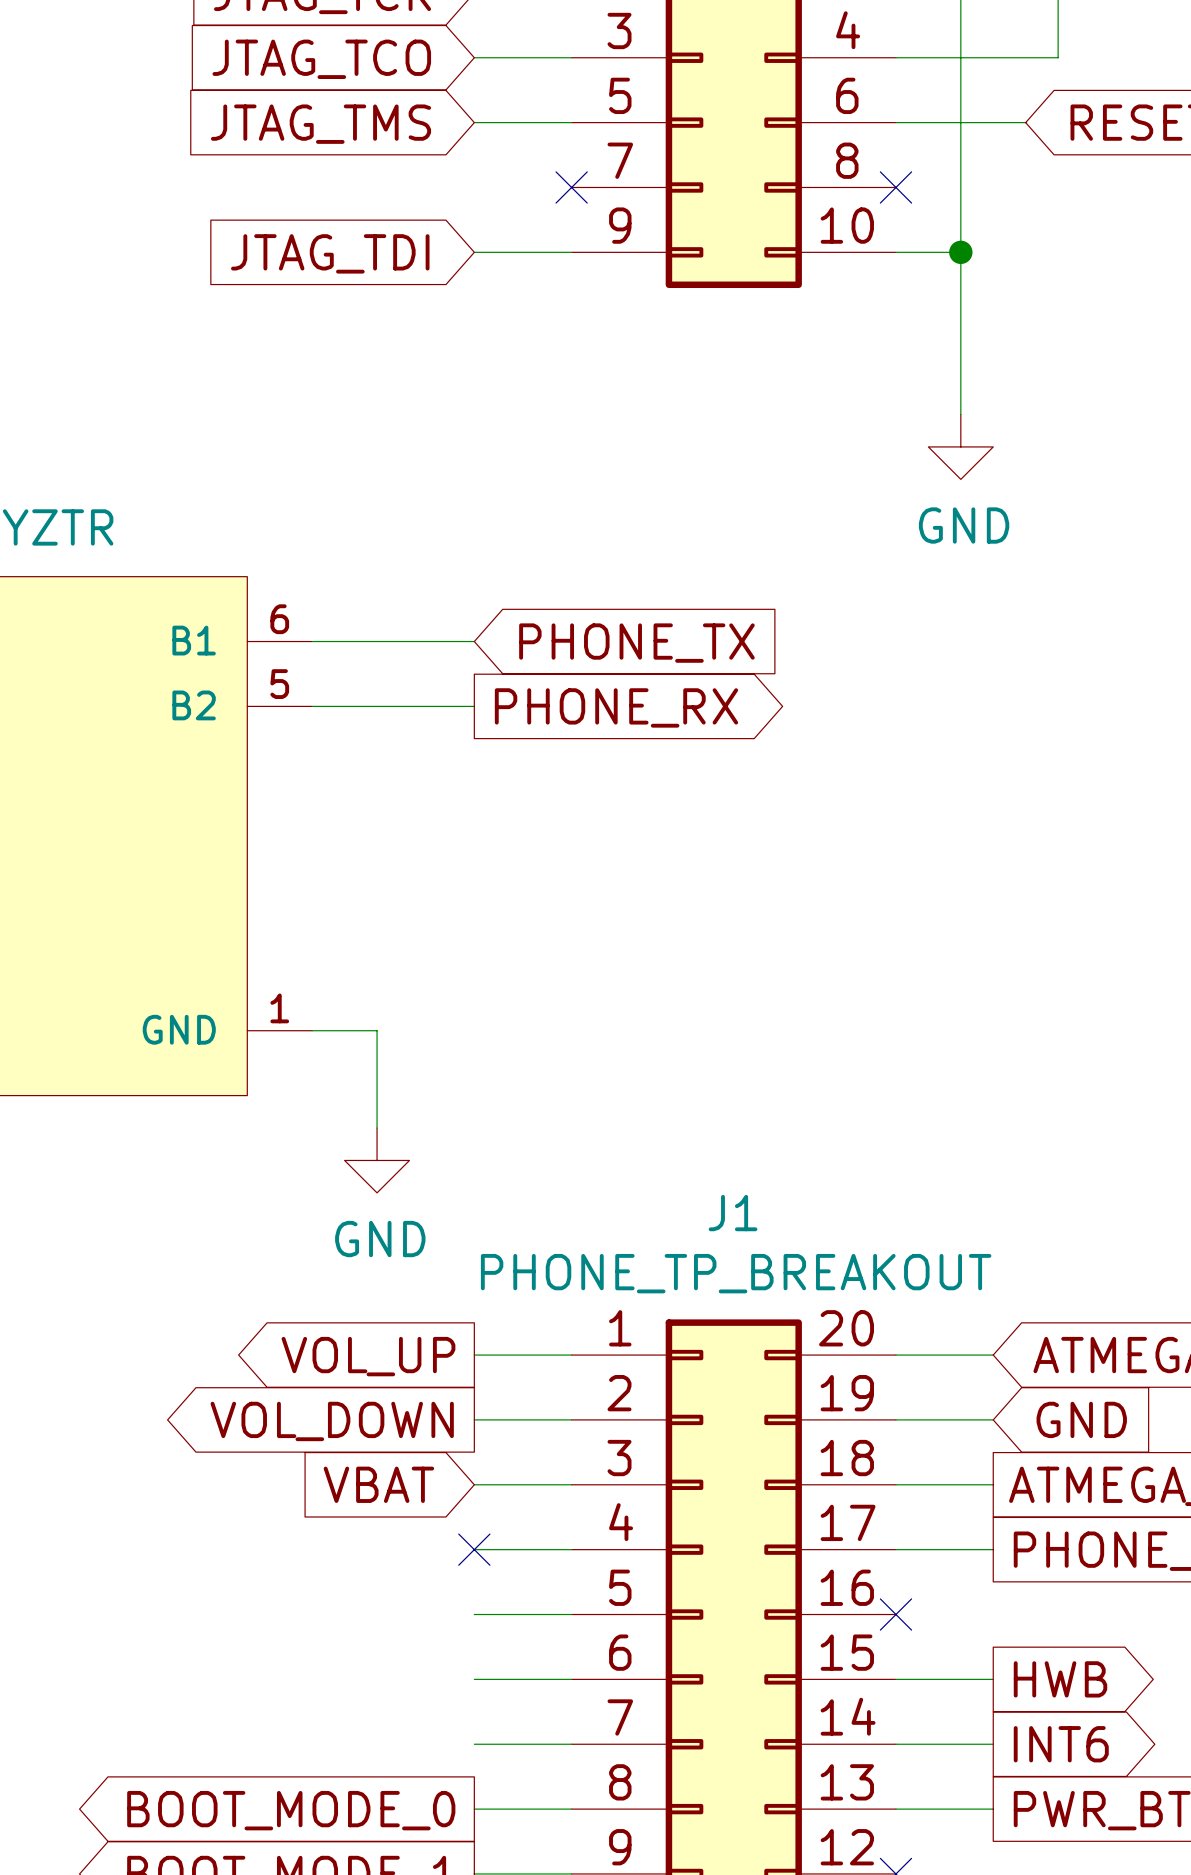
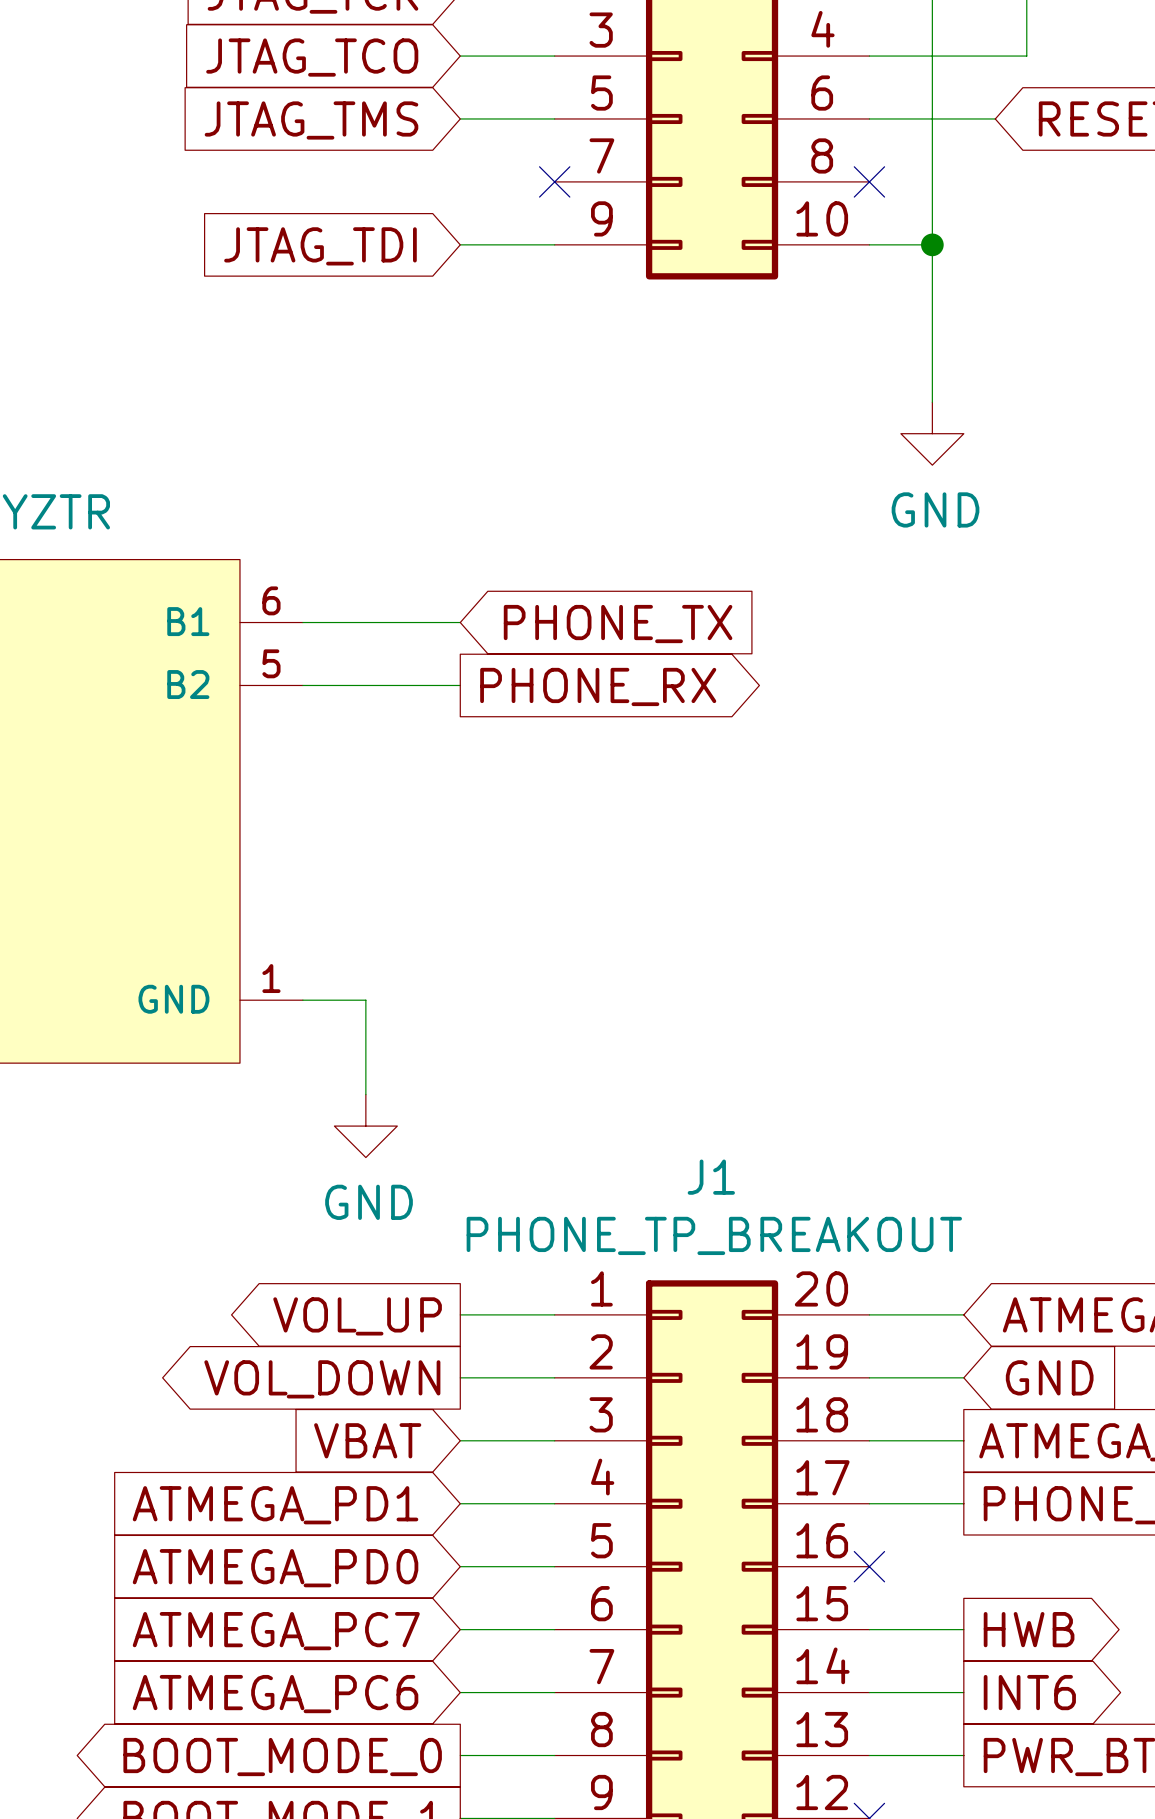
no-connect mark: (474, 1549) -> none
global label: none -> ATMEGA_PD1 (275, 1505)
global label: none -> ATMEGA_PD0 (275, 1568)
global label: none -> ATMEGA_PC7 (276, 1631)
global label: none -> ATMEGA_PC6 (275, 1694)

